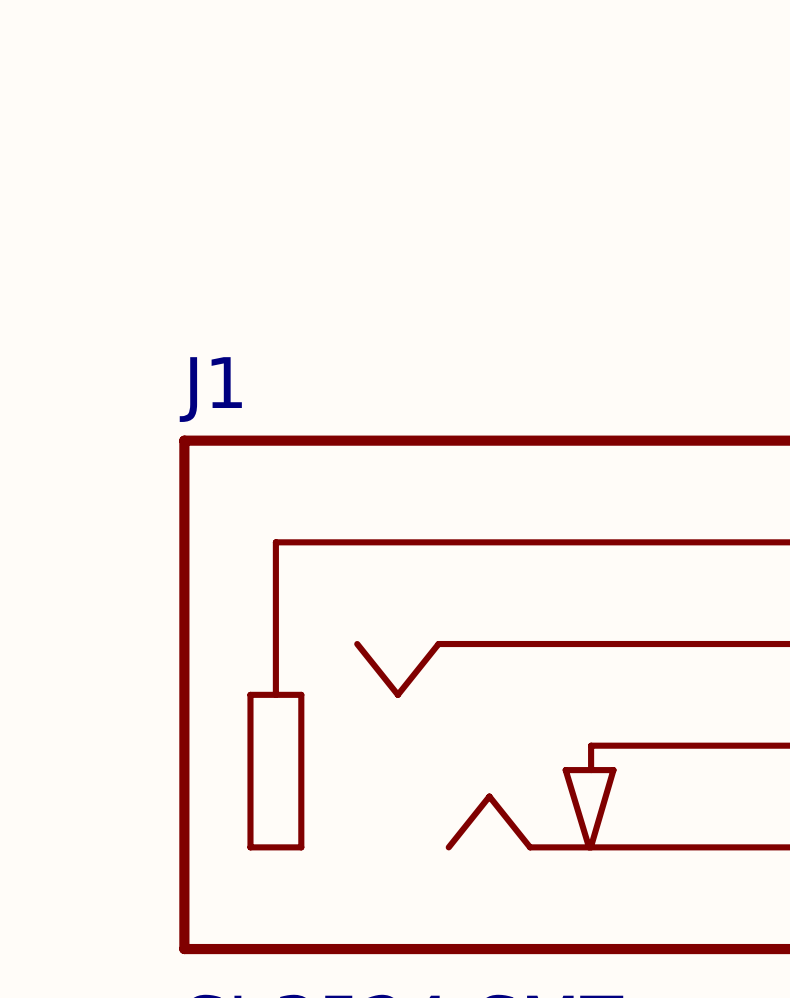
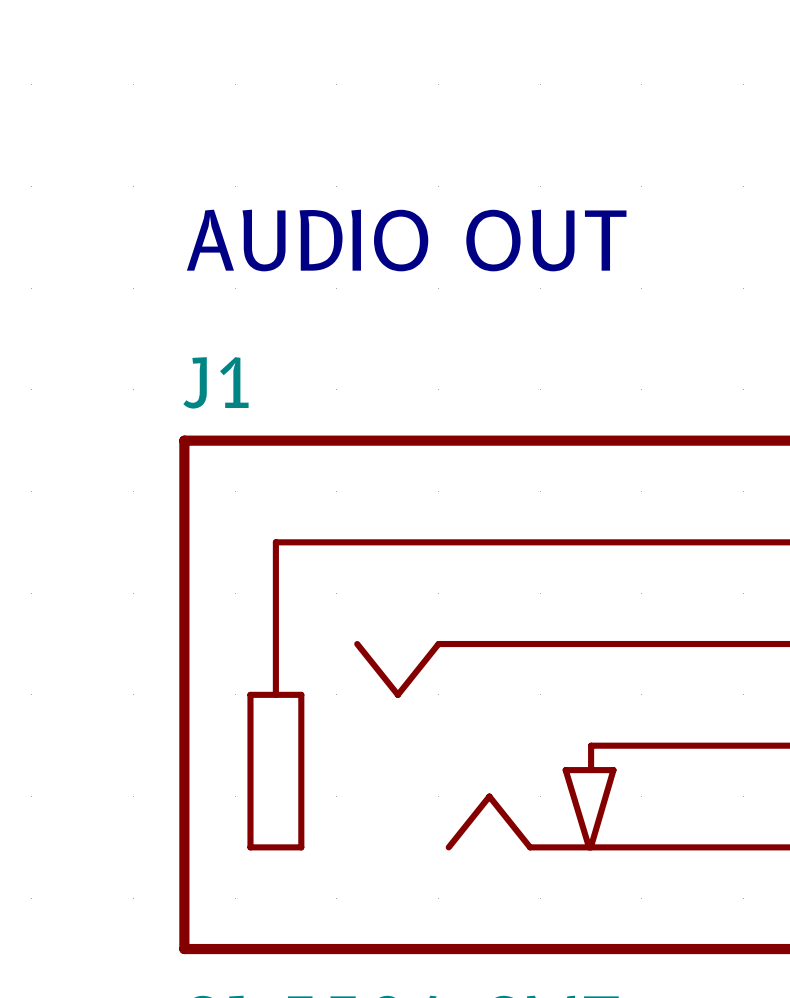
text: none -> AUDIO OUT (406, 240)

